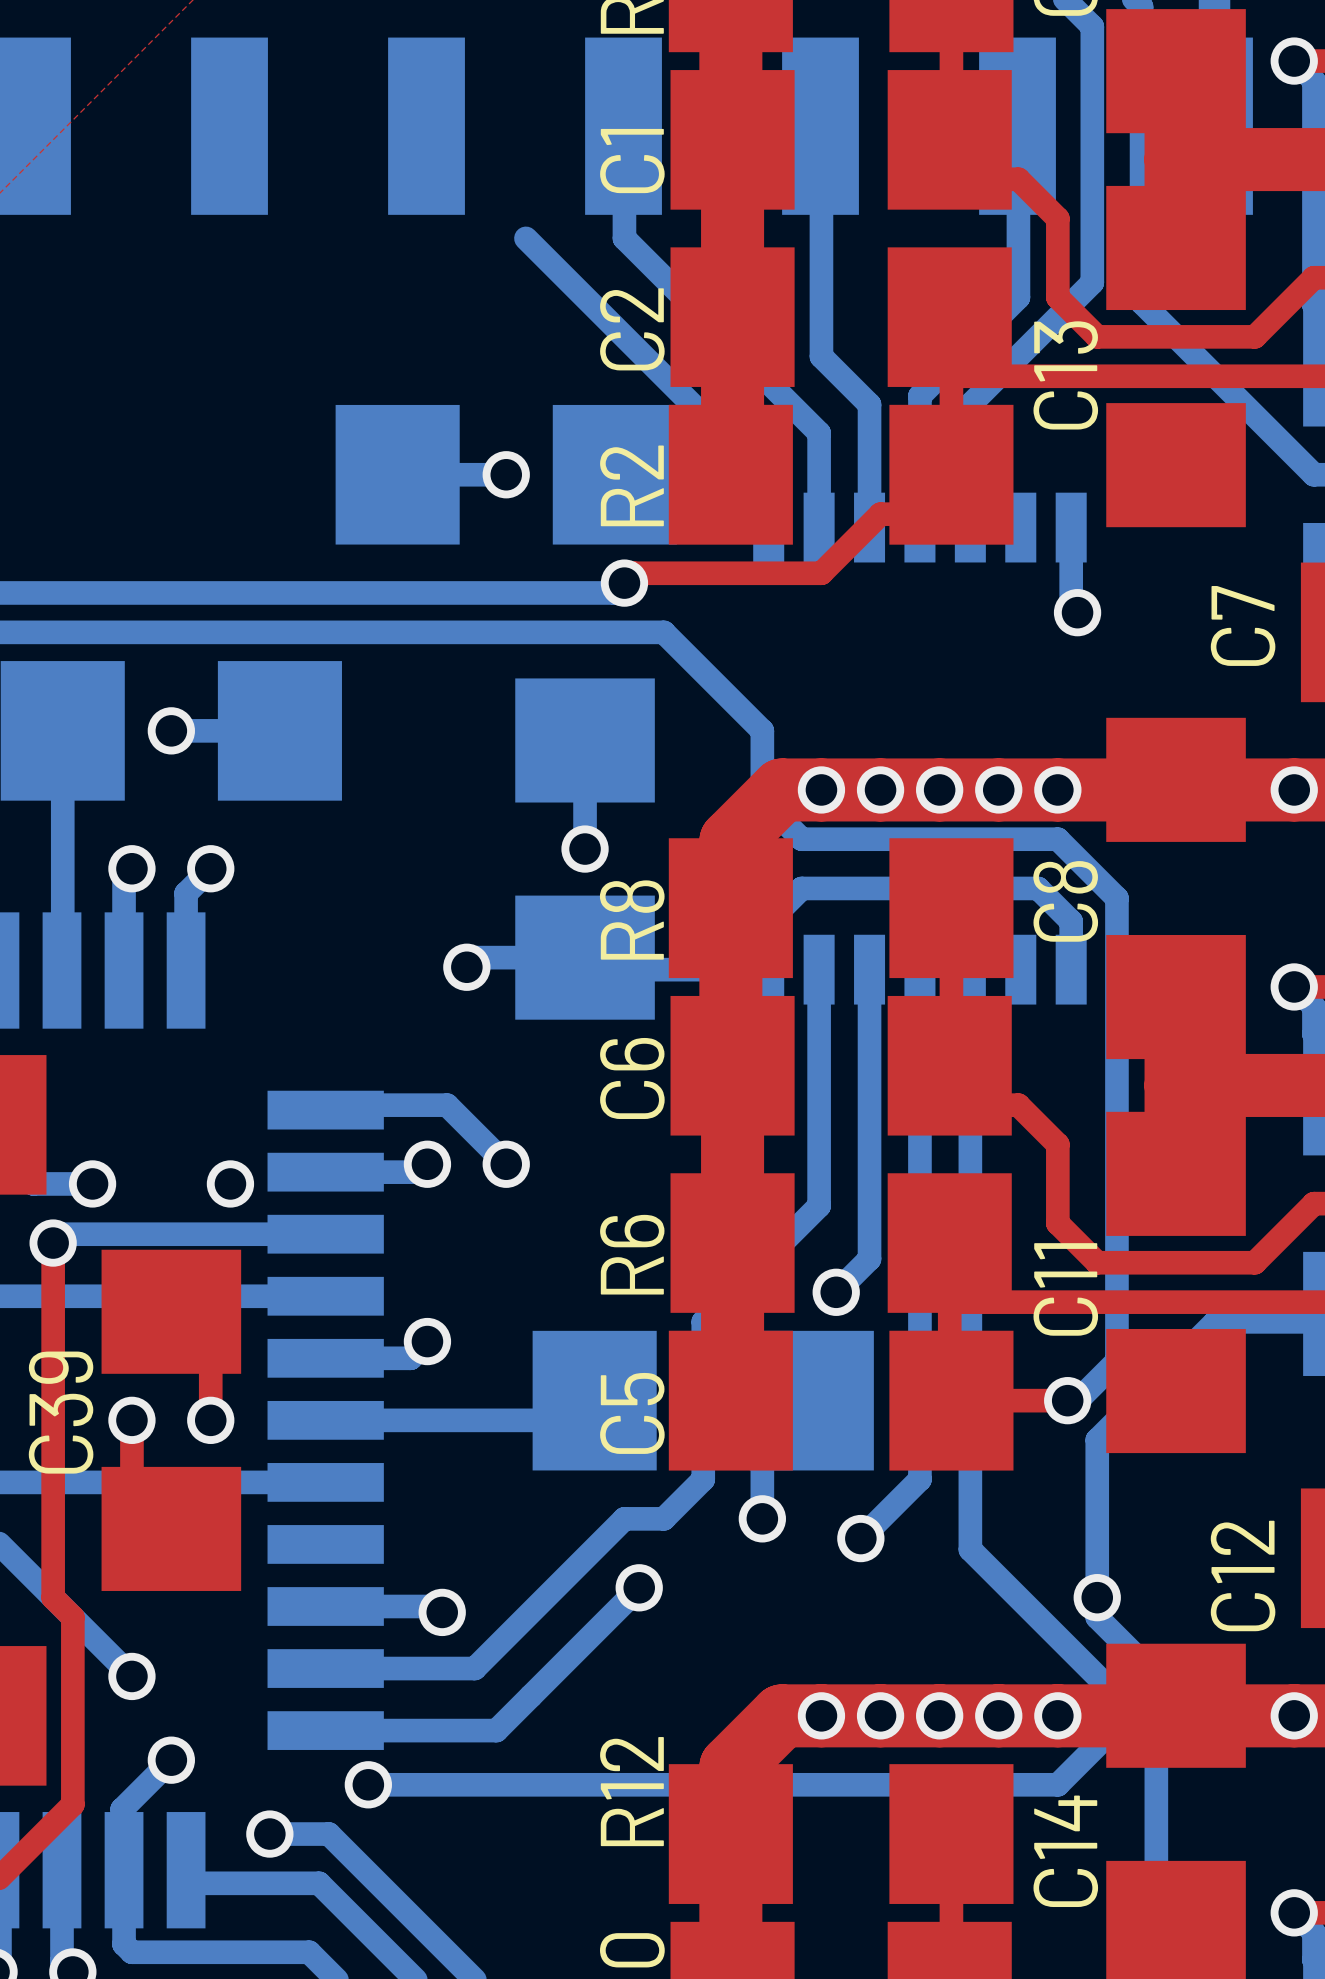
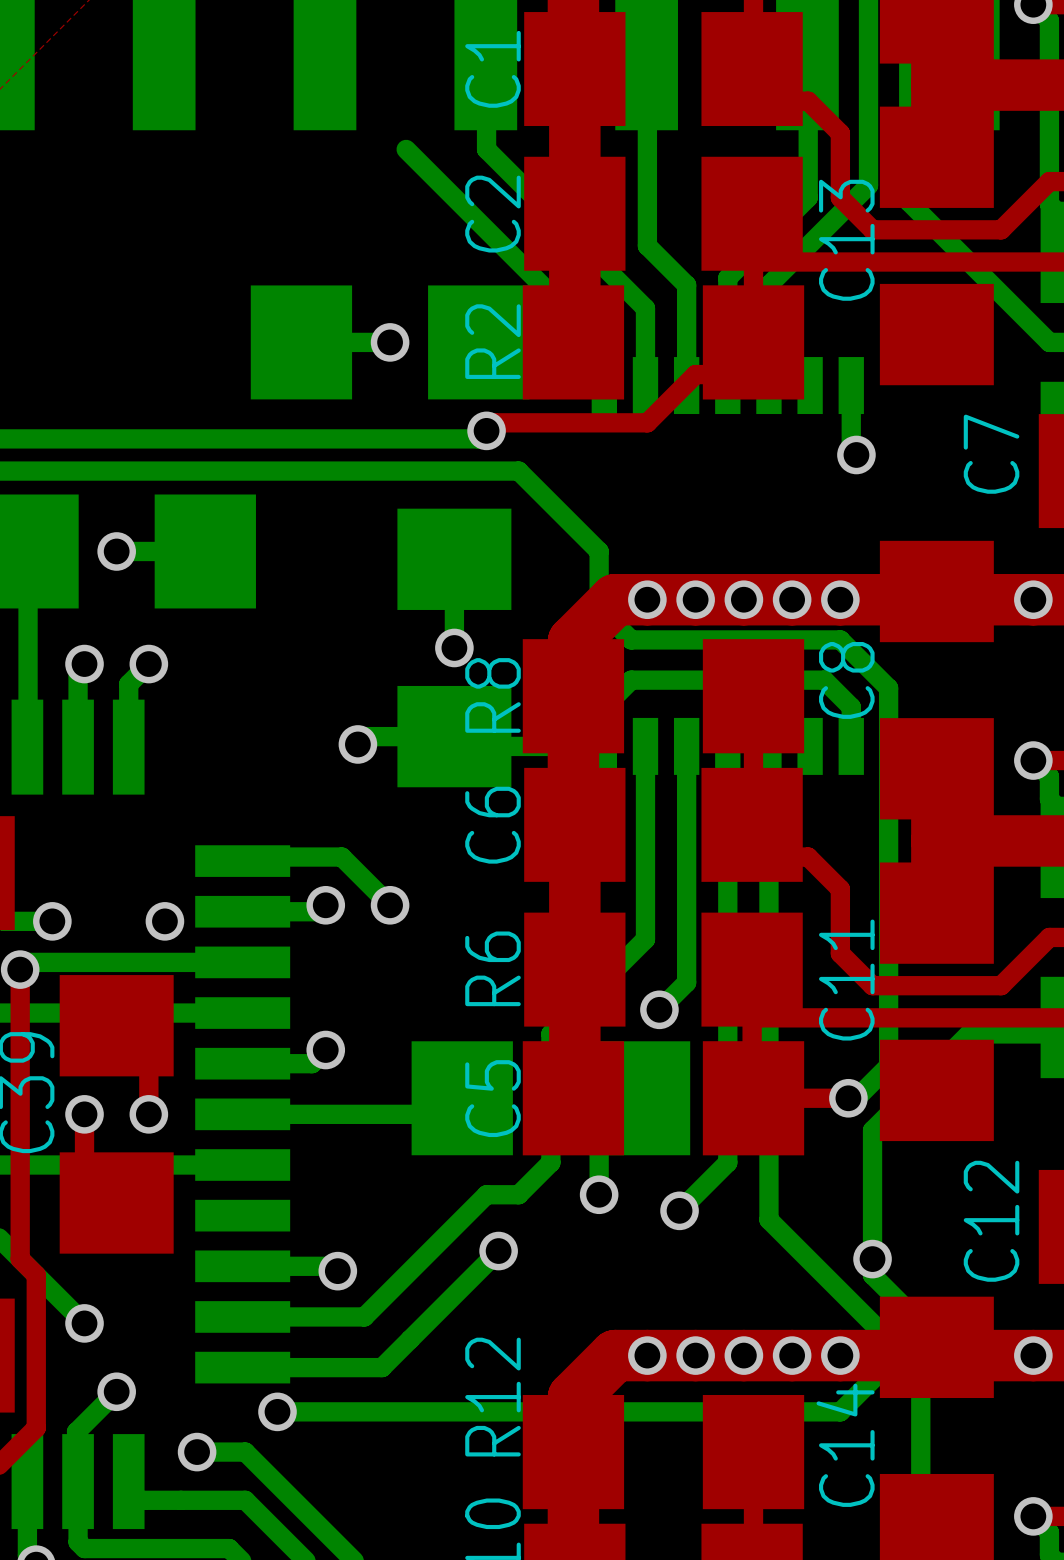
bottom track: (186, 1870) (199, 1883) (319, 1883) (328, 1893) -> (128, 1481) (128, 1500) (245, 1500)

